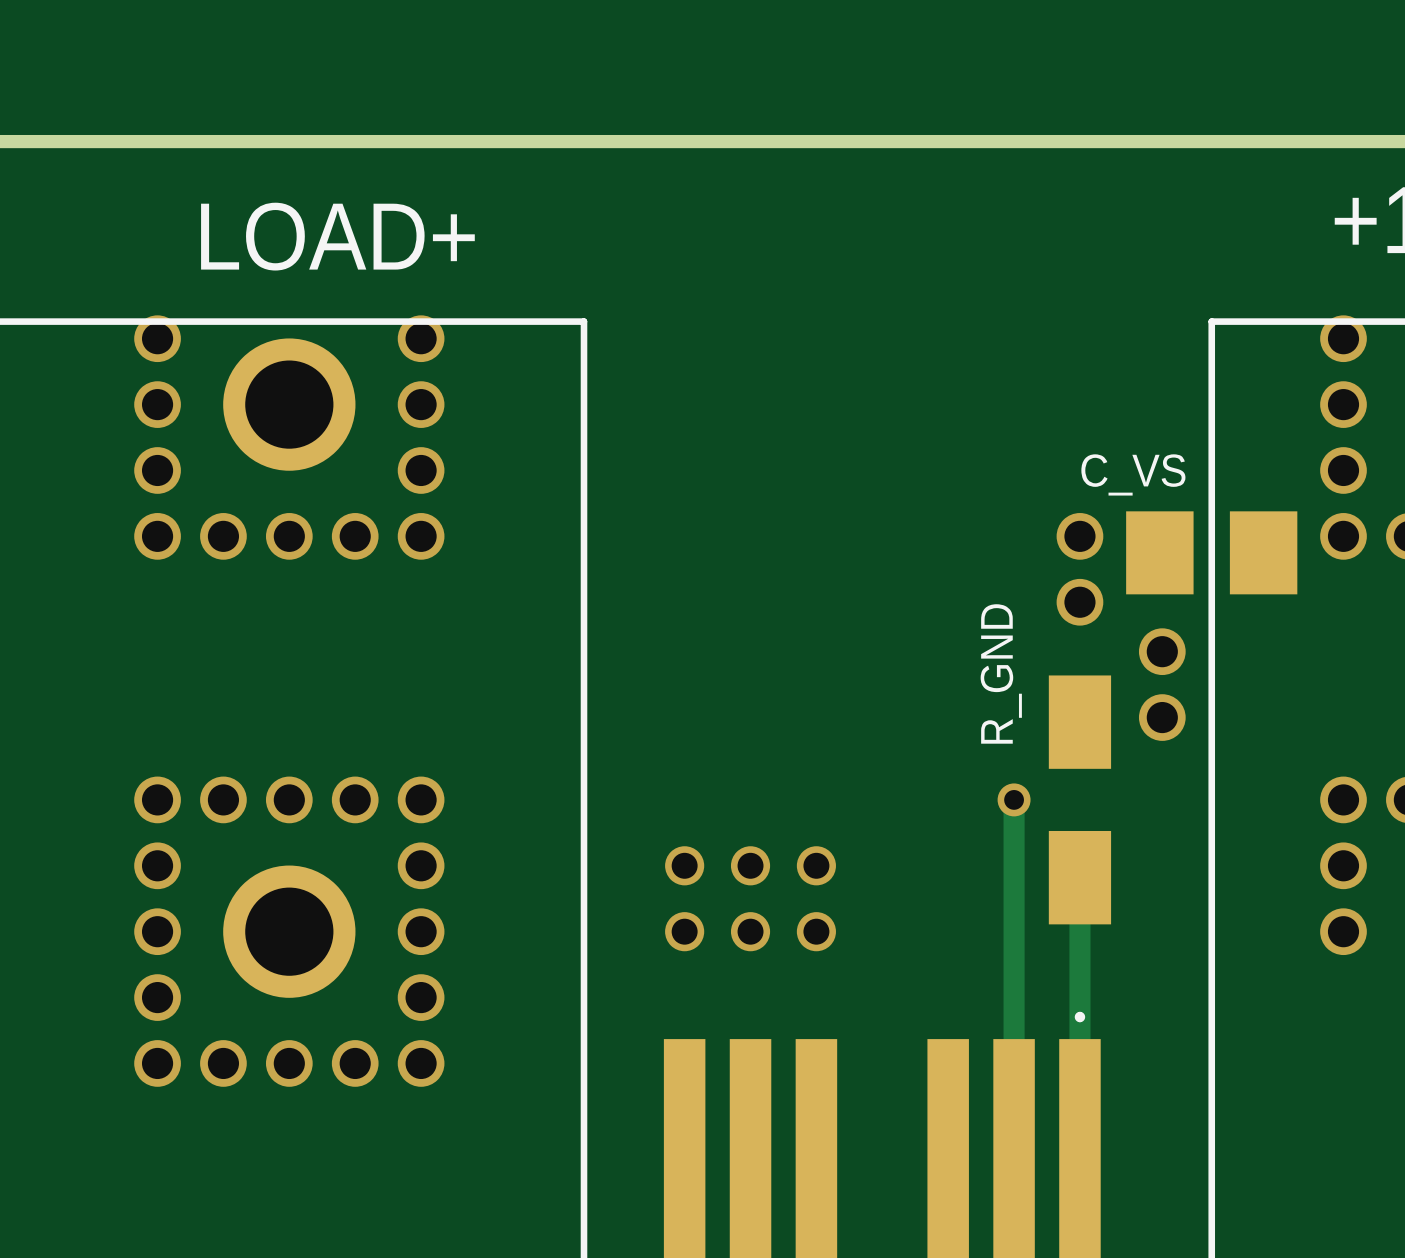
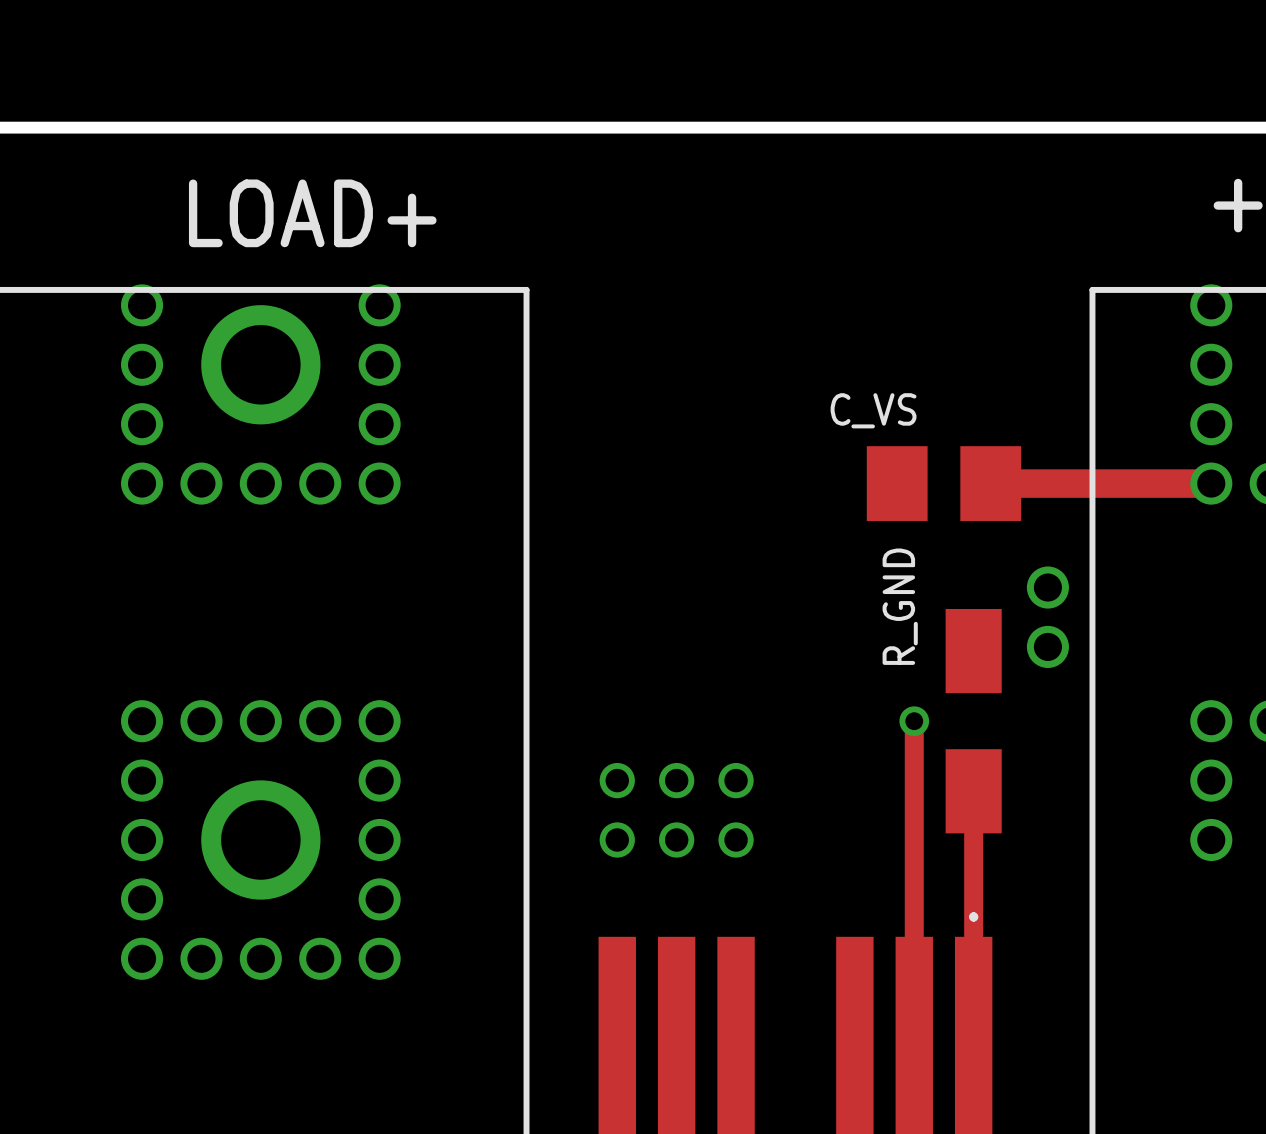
via: (1079, 536) -> none
track: none -> (990, 483) (1211, 483)
C_VS position: (1211, 552) -> (943, 483)
via: (1079, 602) -> none

